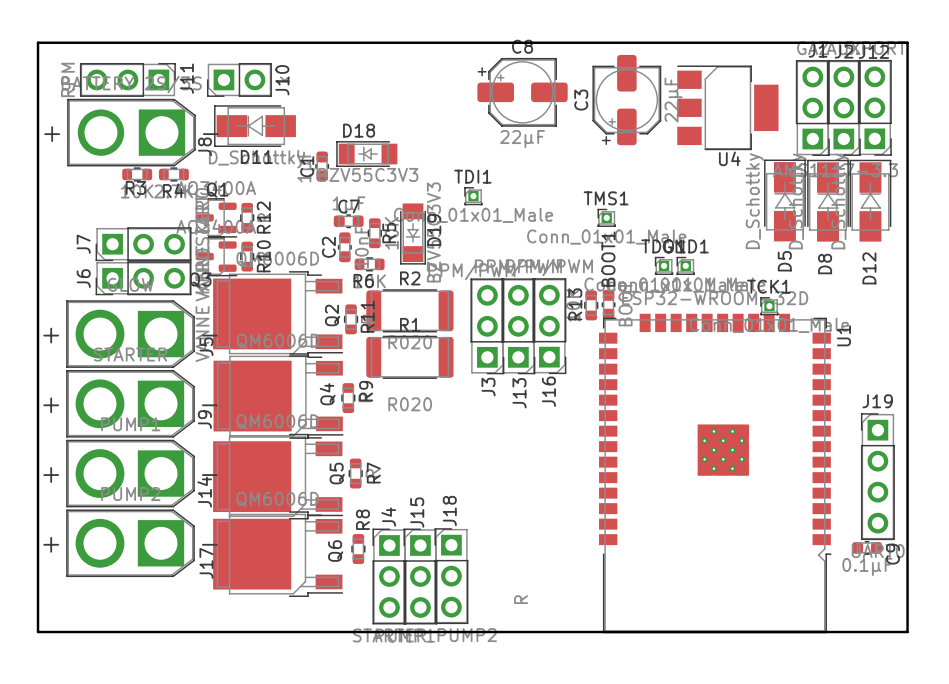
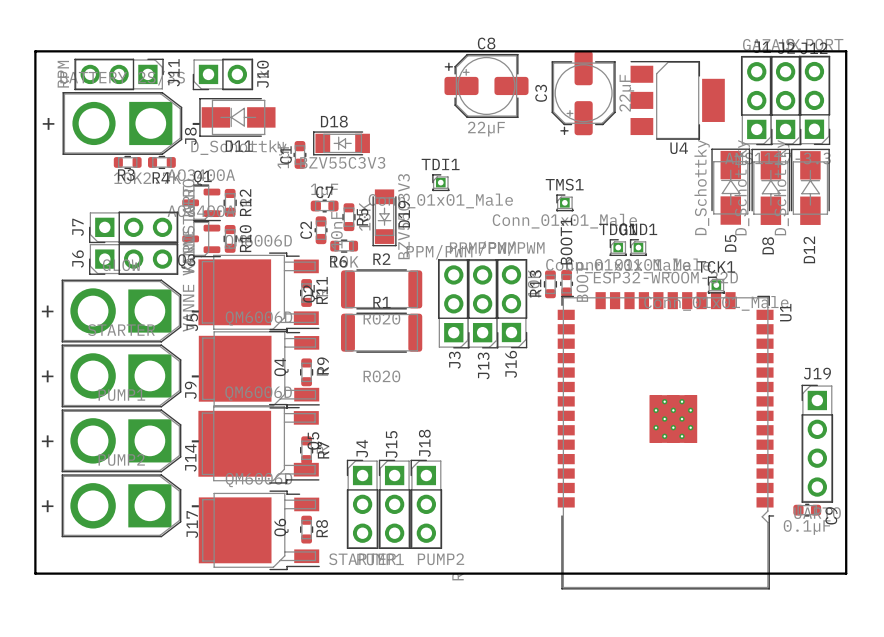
board edge: (38, 55) (38, 42) (907, 42) (907, 632) (38, 632) (38, 616) -> (35, 51) (846, 51) (846, 573) (35, 573)
R11 position: (351, 319) -> (306, 292)
Q4 name position: Q4 (327, 394) -> Q4 (281, 367)
R9 position: (348, 398) -> (306, 372)
R7 position: (355, 473) -> (306, 450)
R8 name position: R8 (362, 519) -> R8 (322, 528)
R8 position: (358, 549) -> (306, 529)
Q6 name position: Q6 (335, 551) -> Q6 (281, 527)
Q6 position: (278, 554) -> (259, 530)
J4 position: (389, 576) -> (362, 504)
J15 position: (420, 576) -> (394, 504)
J18 position: (451, 576) -> (426, 504)

